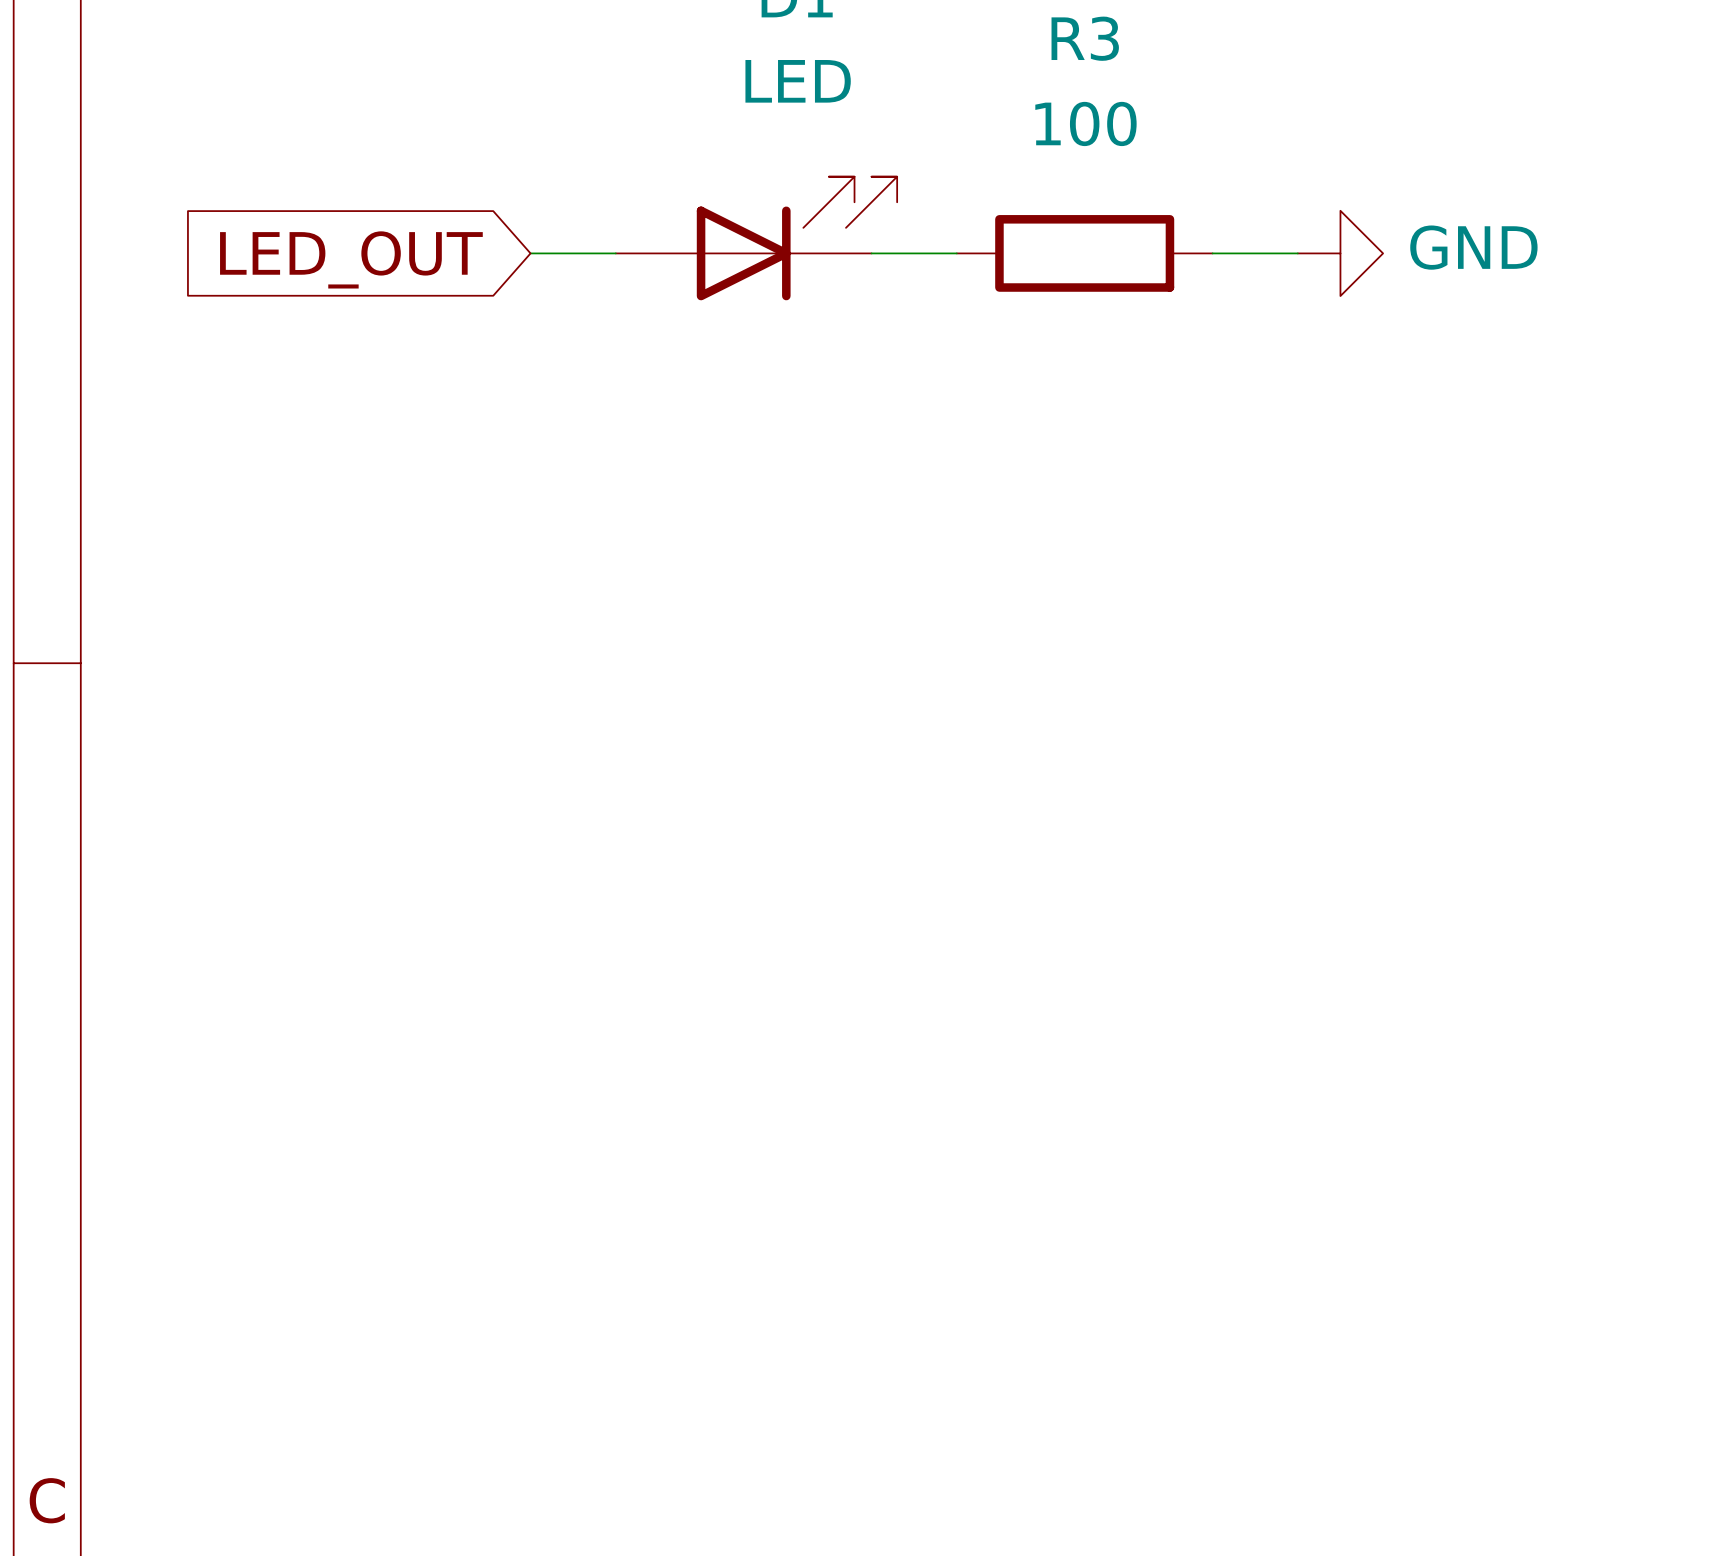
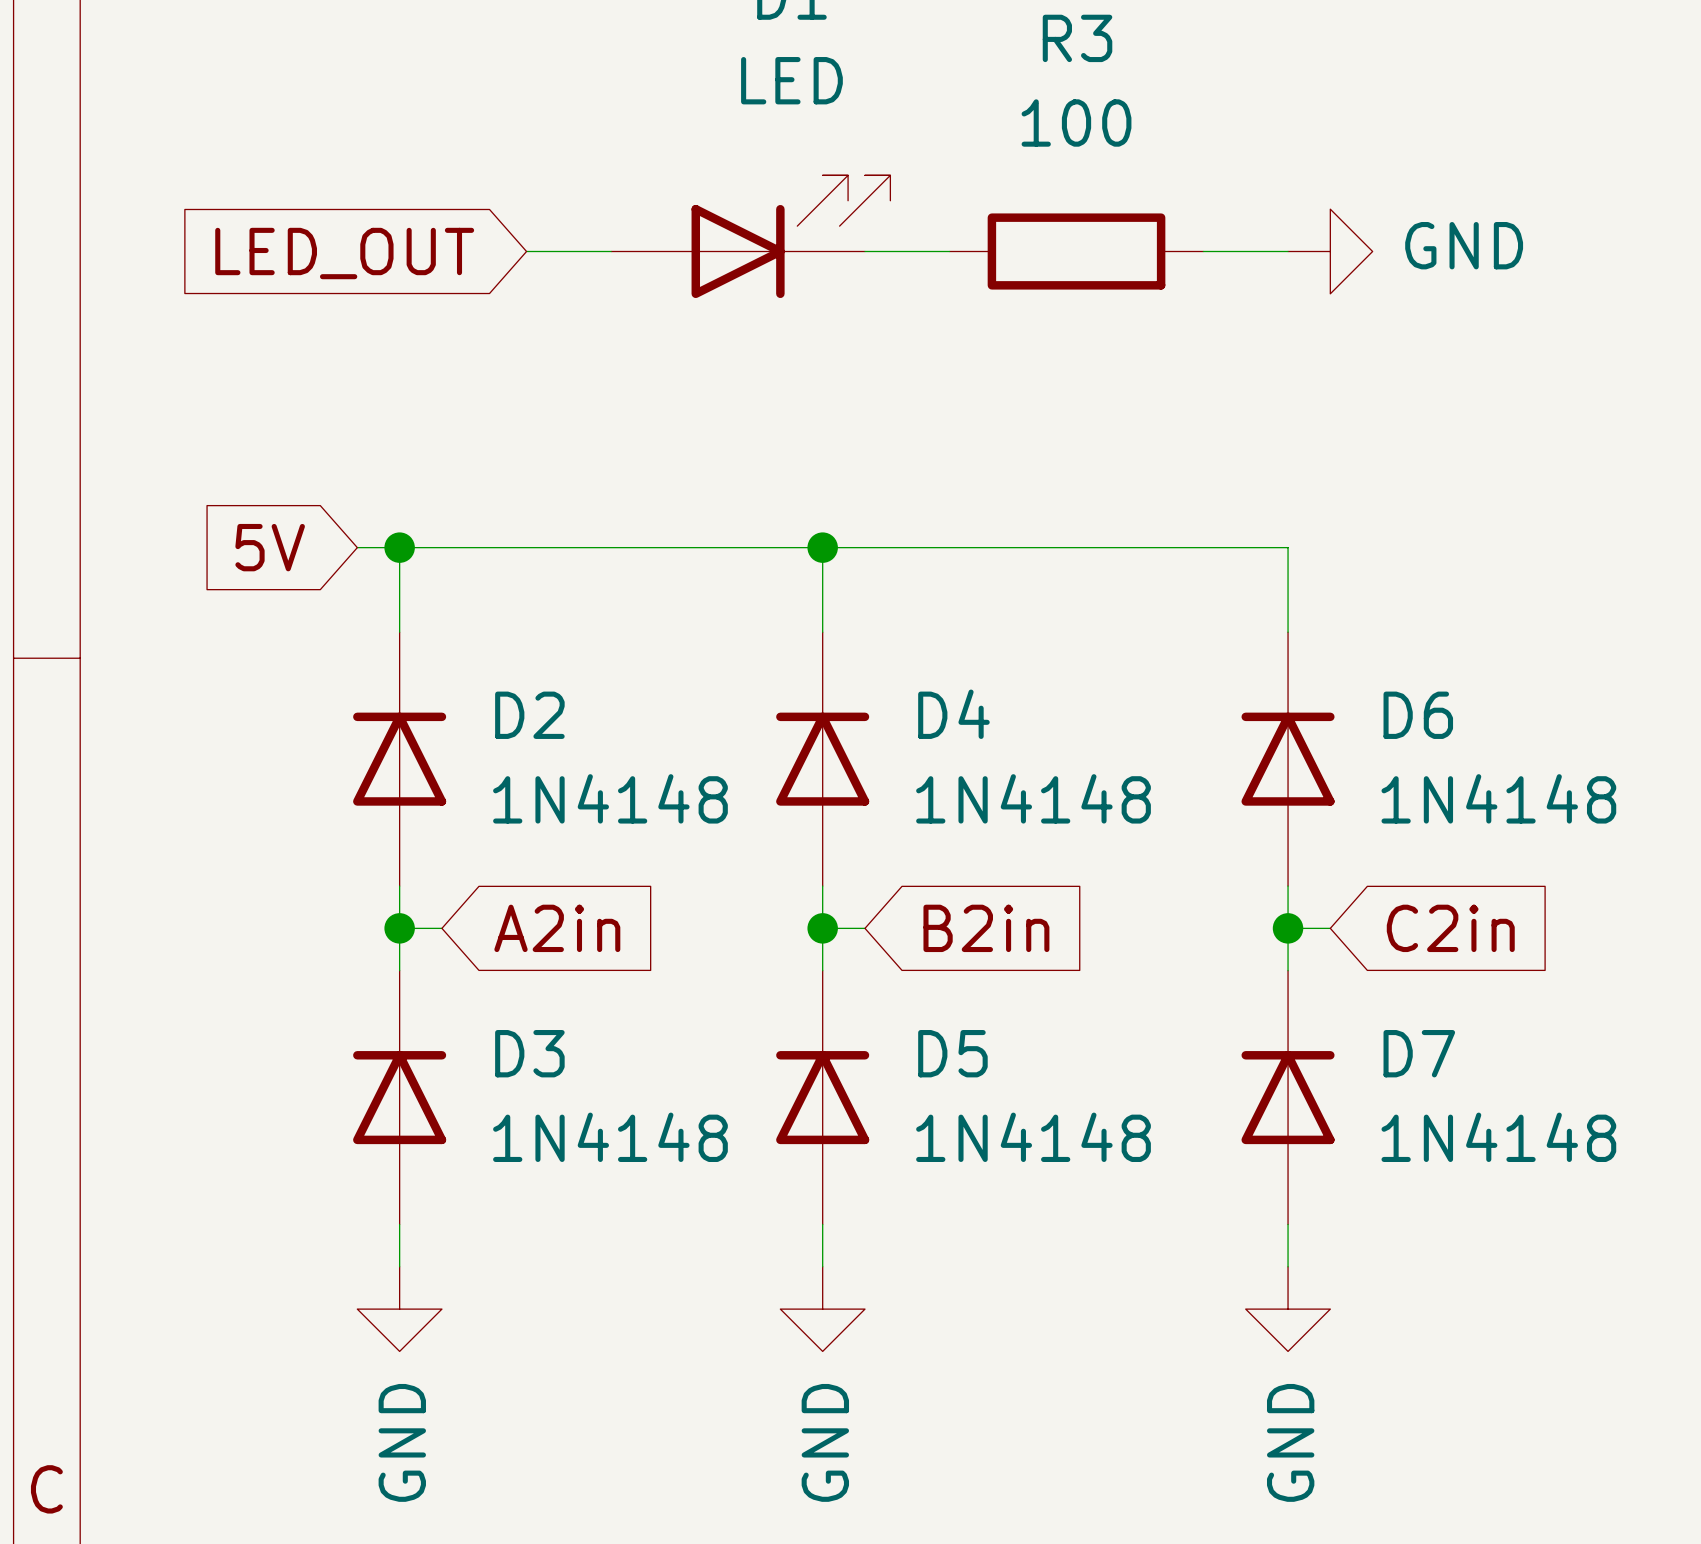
wire: none -> (357, 547) (1288, 547) (1288, 632)
wire: none -> (399, 547) (399, 632)
junction: none -> (399, 547)
wire: none -> (822, 547) (822, 632)
junction: none -> (822, 547)
global label: none -> 5V (270, 547)
D2: none -> 1N4148 (399, 759)
D4: none -> 1N4148 (822, 759)
D6: none -> 1N4148 (1288, 759)
wire: none -> (399, 886) (399, 970)
wire: none -> (822, 886) (822, 970)
wire: none -> (1288, 886) (1288, 970)
global label: none -> A2in (557, 928)
global label: none -> B2in (986, 928)
global label: none -> C2in (1450, 928)
wire: none -> (399, 928) (441, 928)
junction: none -> (399, 928)
wire: none -> (822, 928) (864, 928)
junction: none -> (822, 928)
wire: none -> (1288, 928) (1330, 928)
junction: none -> (1288, 928)
D3: none -> 1N4148 (399, 1097)
D5: none -> 1N4148 (822, 1097)
D7: none -> 1N4148 (1288, 1097)
wire: none -> (399, 1224) (399, 1266)
wire: none -> (822, 1224) (822, 1266)
wire: none -> (1288, 1224) (1288, 1266)
power symbol: none -> GND (399, 1309)
power symbol: none -> GND (822, 1309)
power symbol: none -> GND (1288, 1309)

